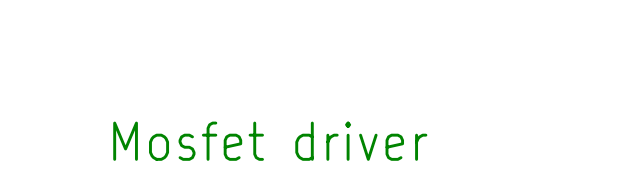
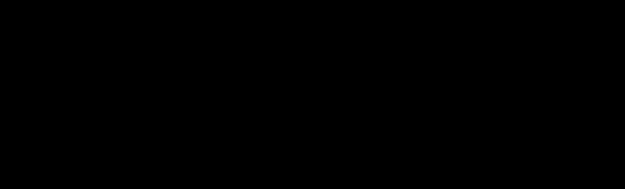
text: Mosfet driver (270, 141) -> none

